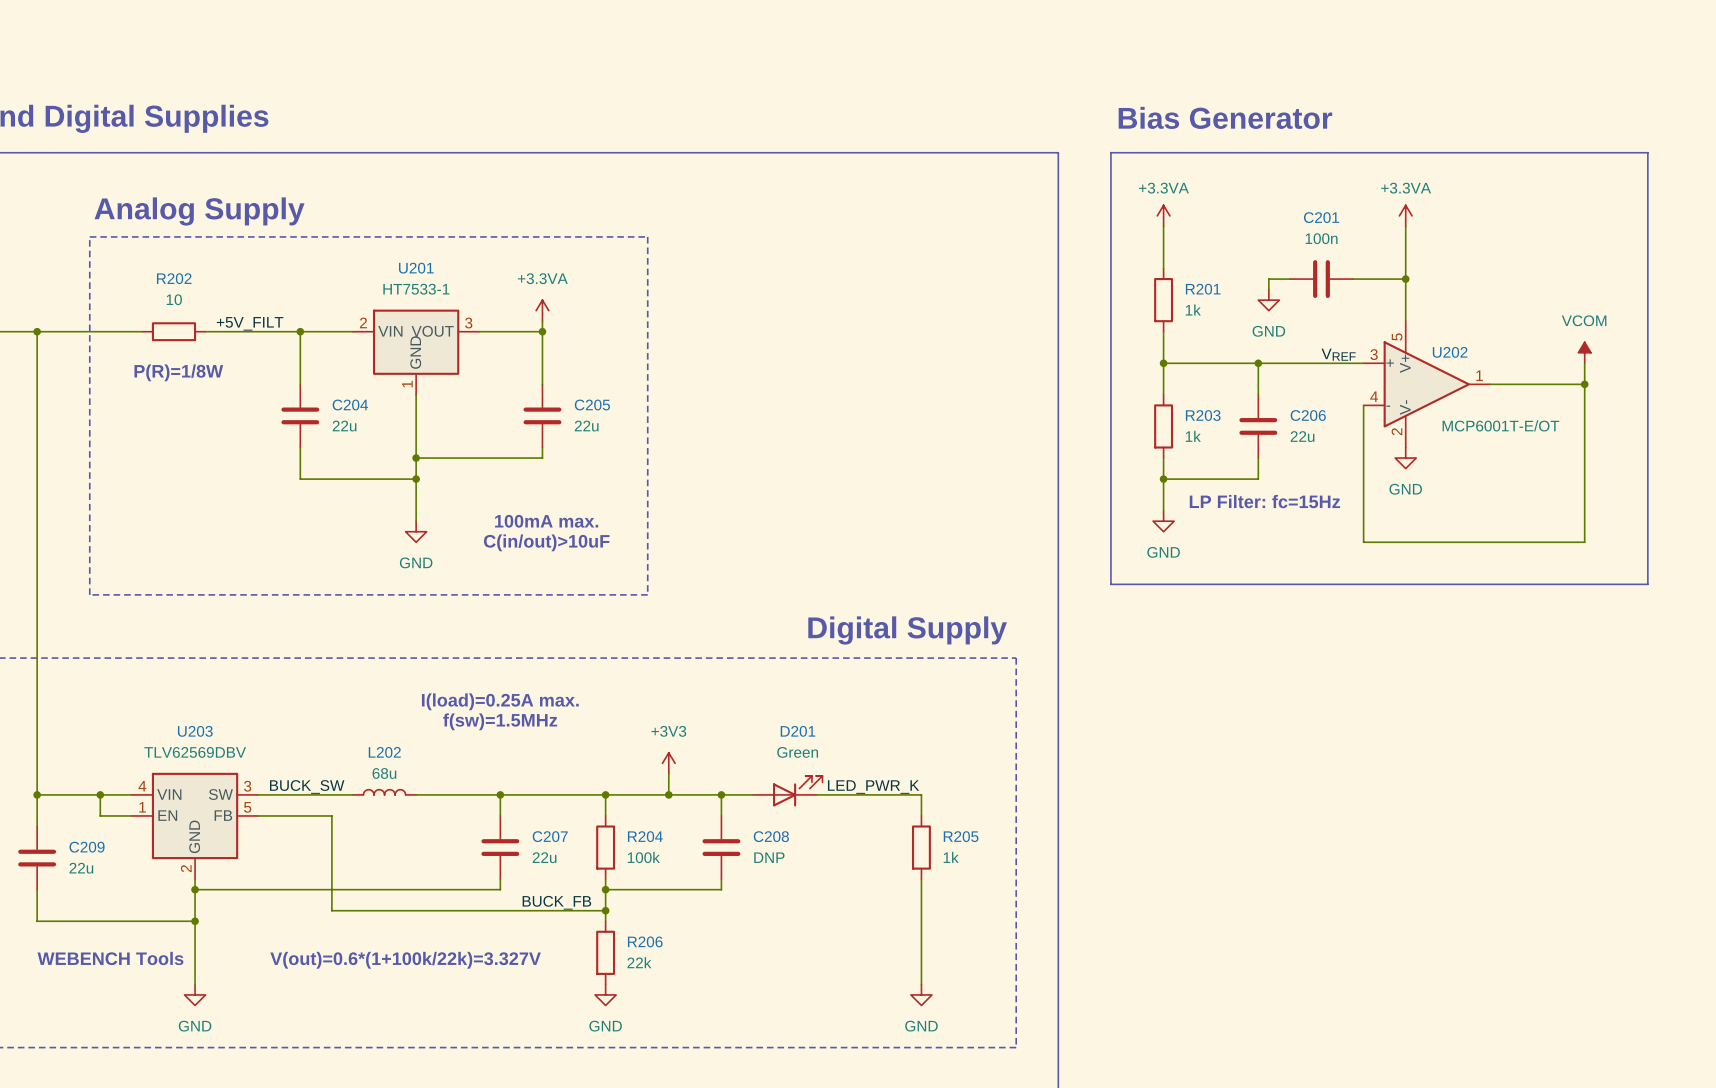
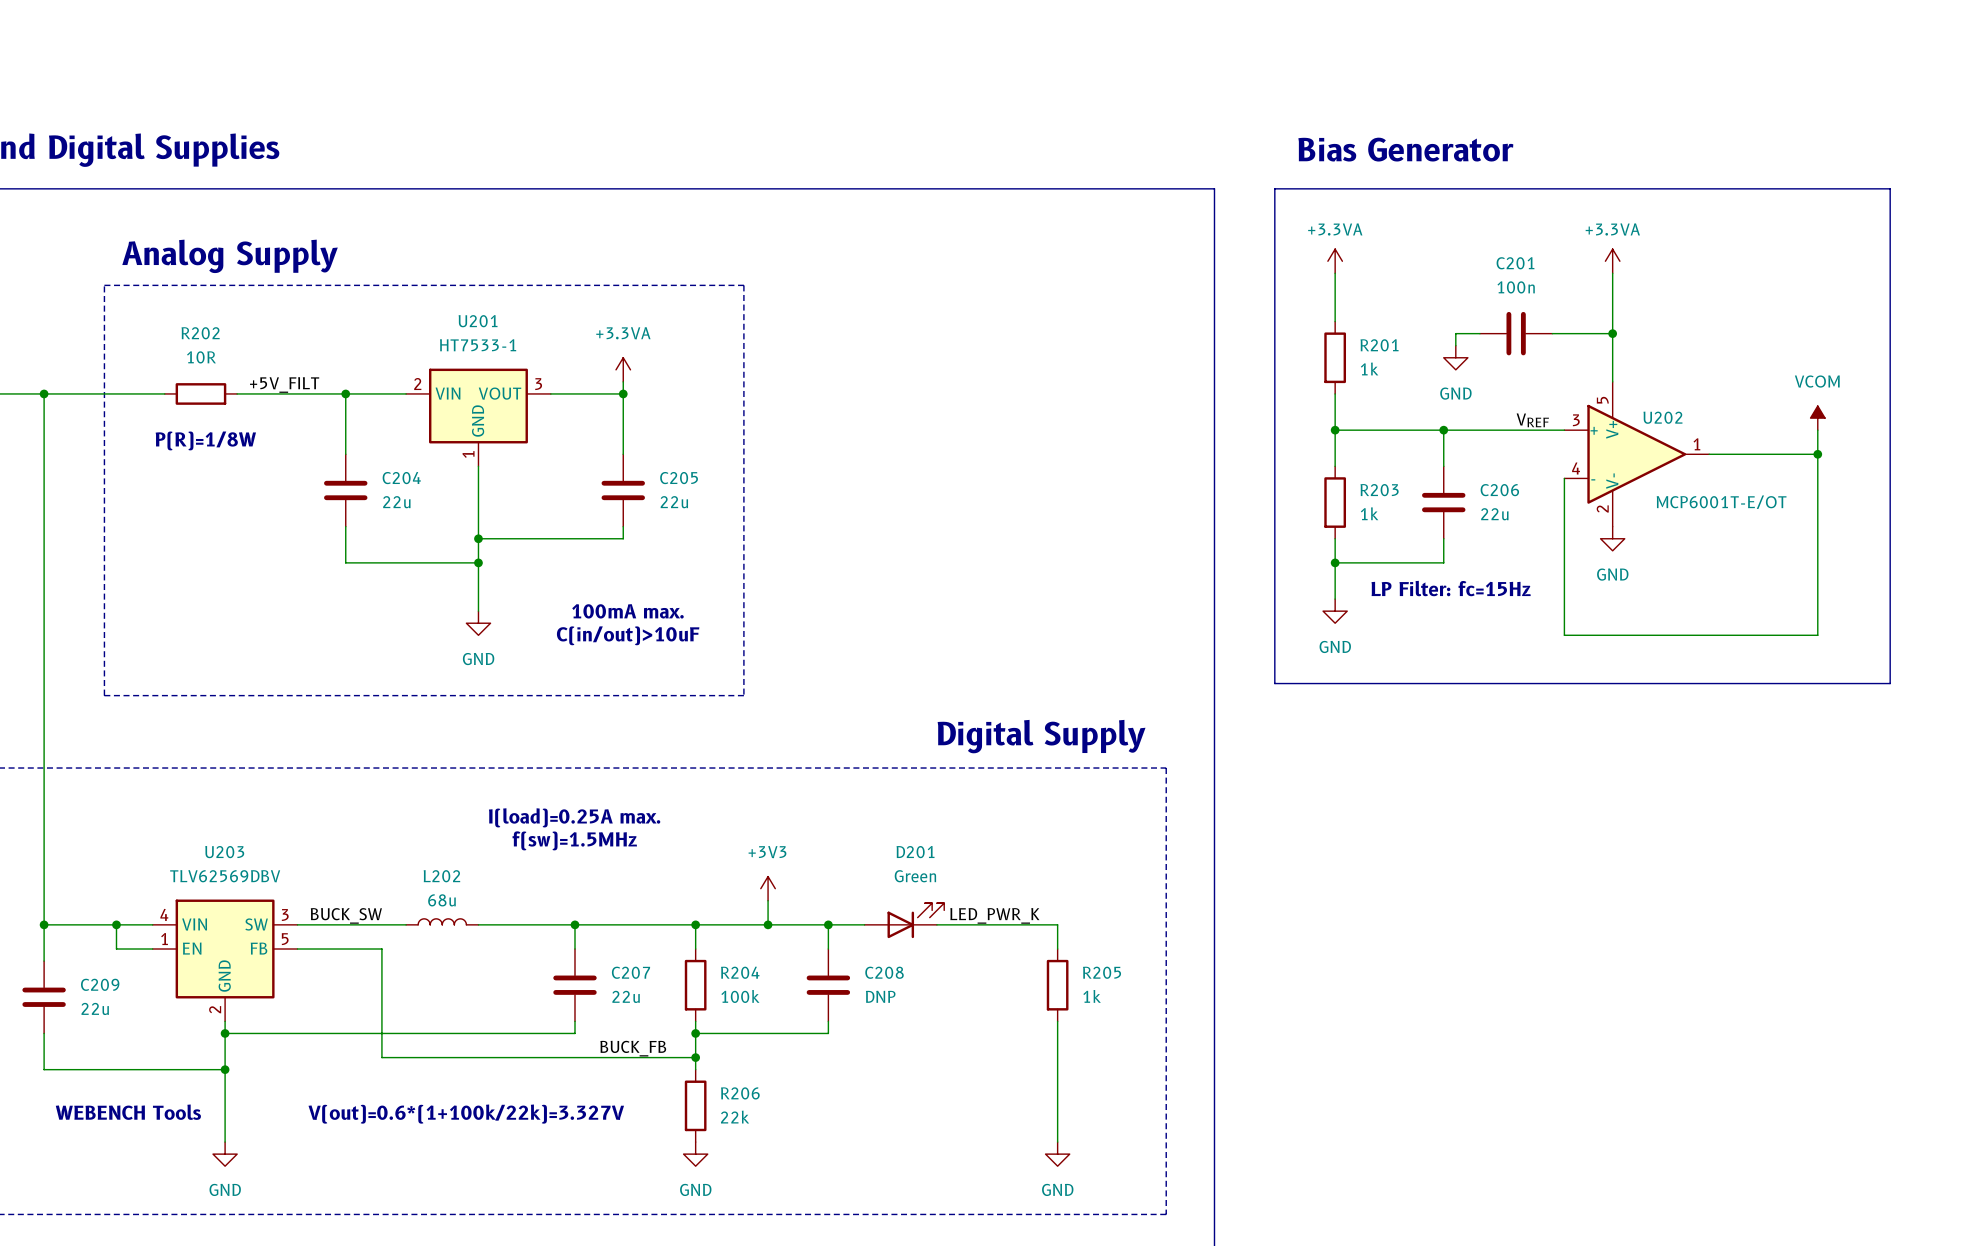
R202 value: 10 (174, 299) -> 10R (201, 357)

